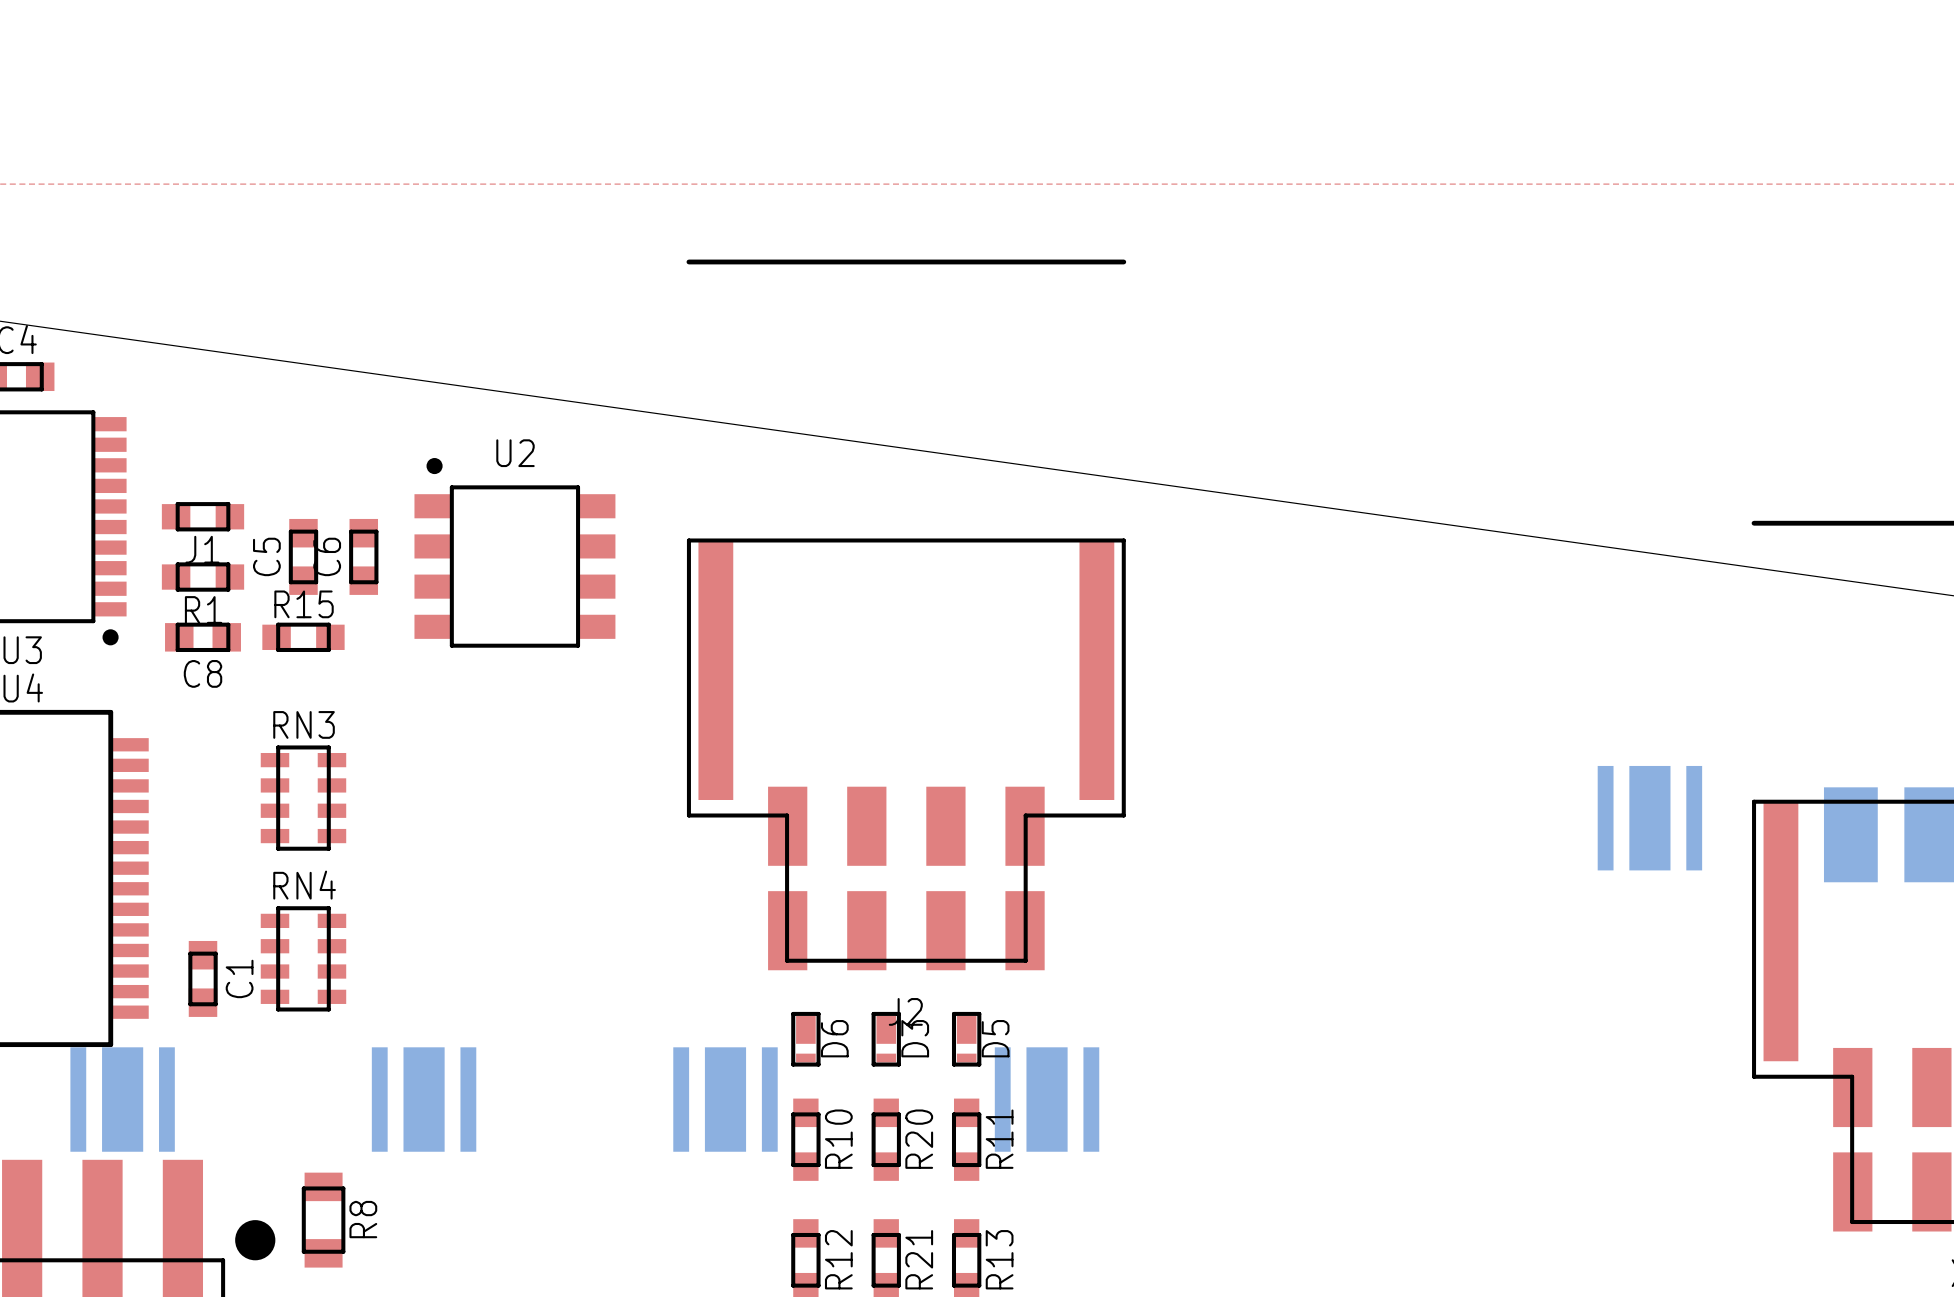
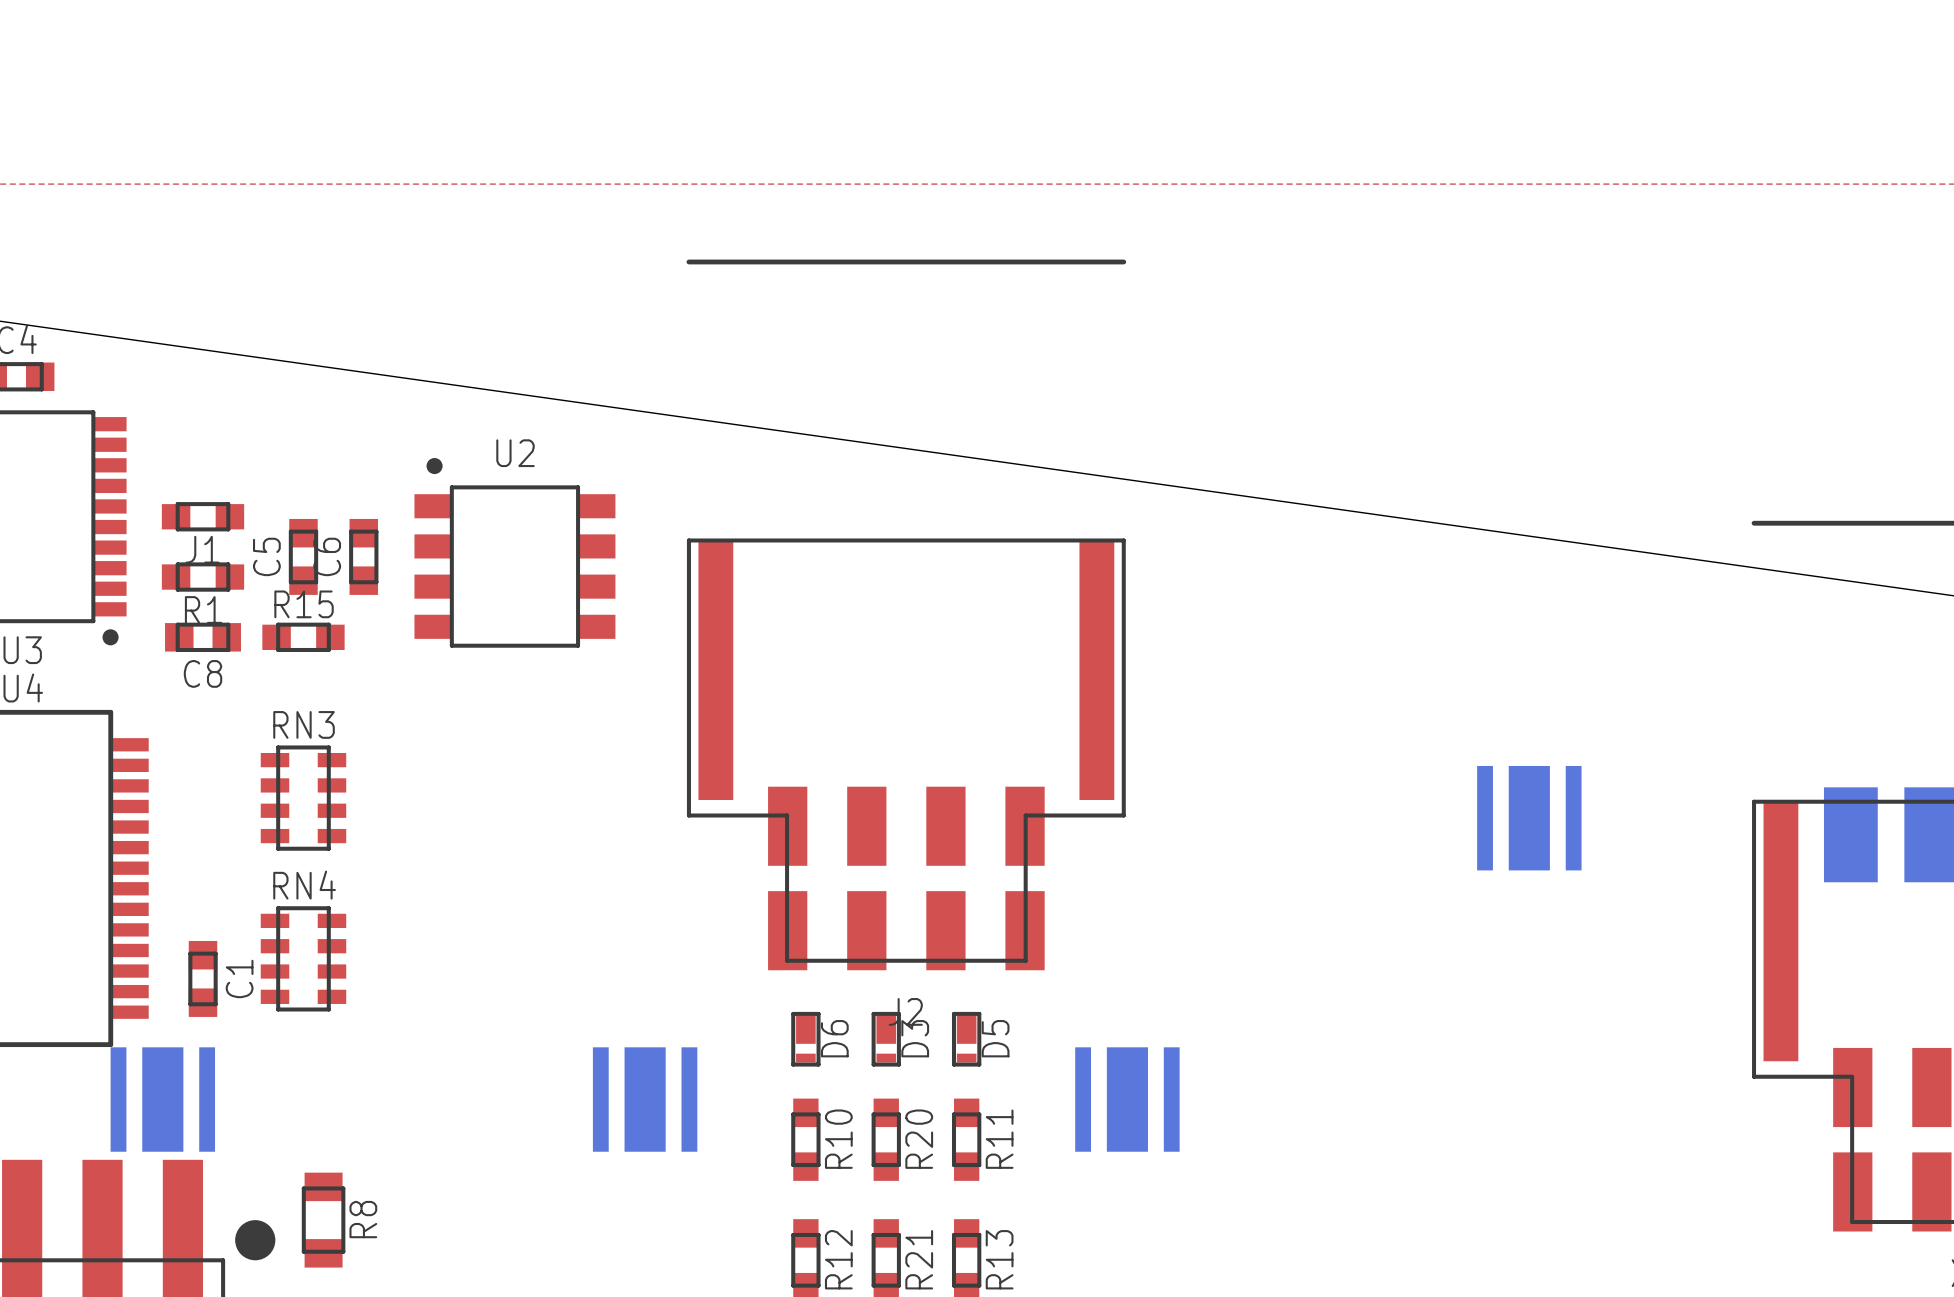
part position: (1649, 818) -> (1529, 818)
part position: (122, 1099) -> (162, 1099)
part: (424, 1099) -> none
part position: (725, 1099) -> (645, 1099)
part position: (1047, 1099) -> (1127, 1099)

